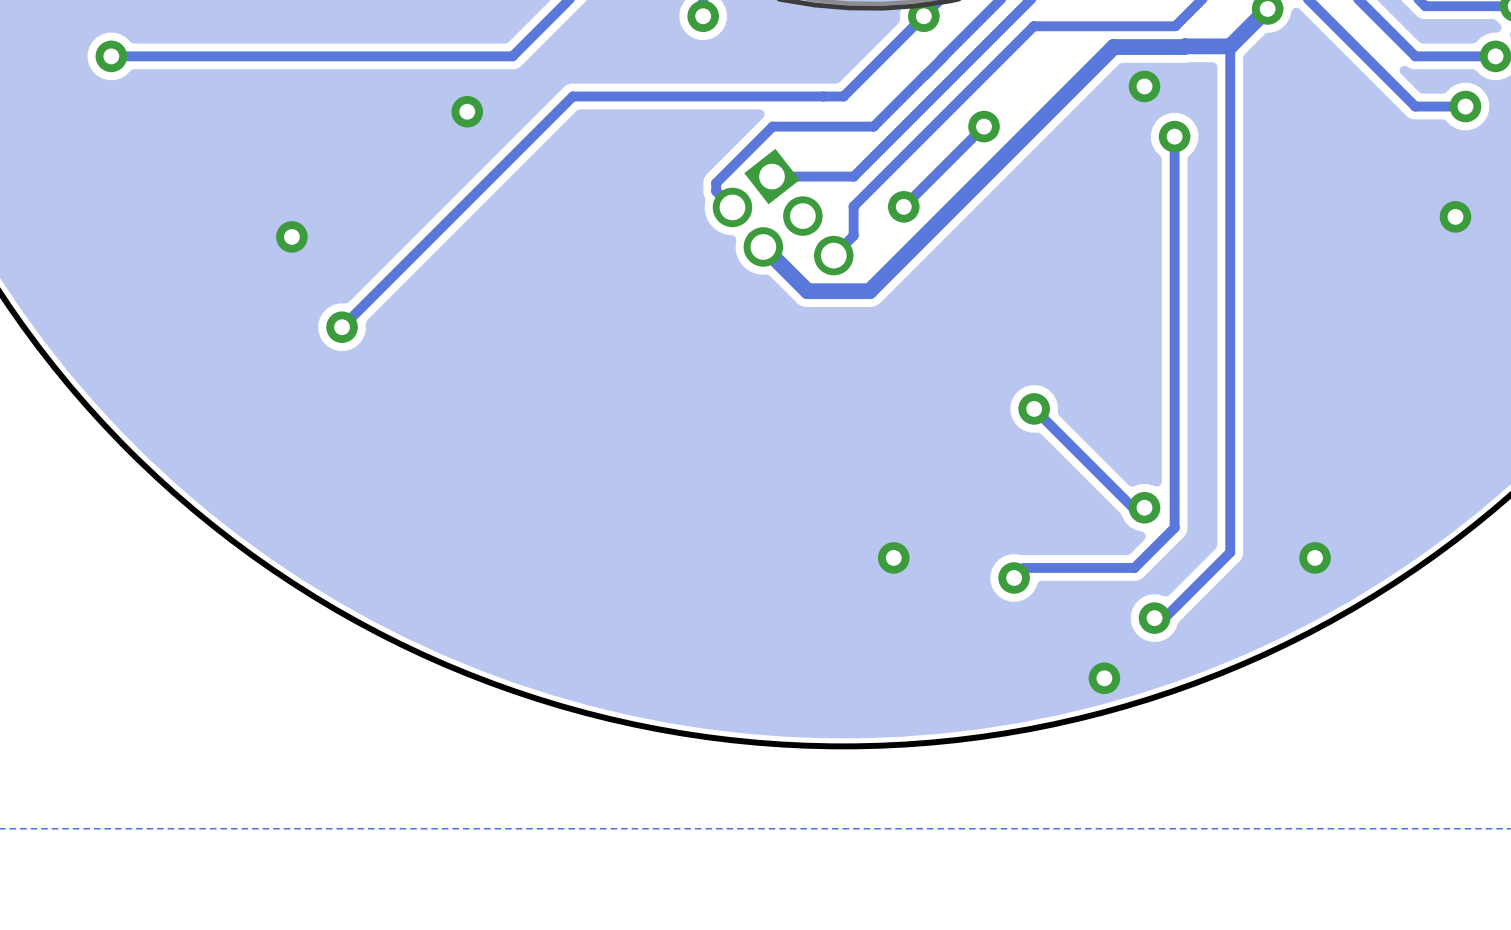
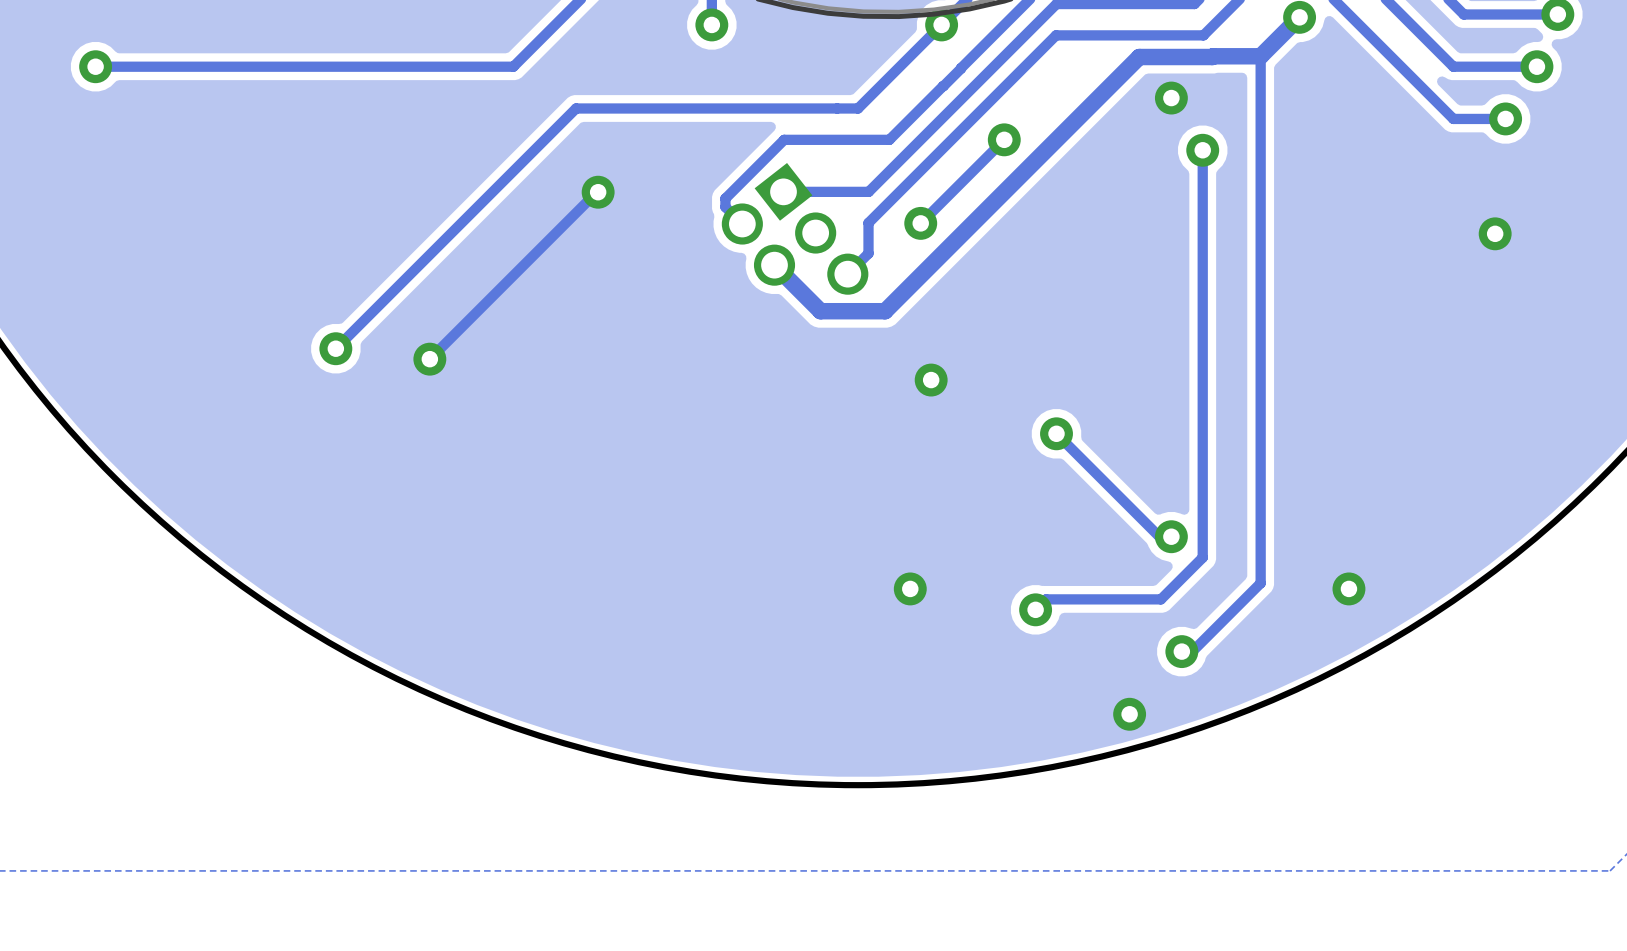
via: (467, 111) -> none
track: none -> (598, 192) (429, 359)
via: none -> (598, 192)
via: (291, 236) -> none
via: none -> (429, 359)
via: none -> (931, 380)

